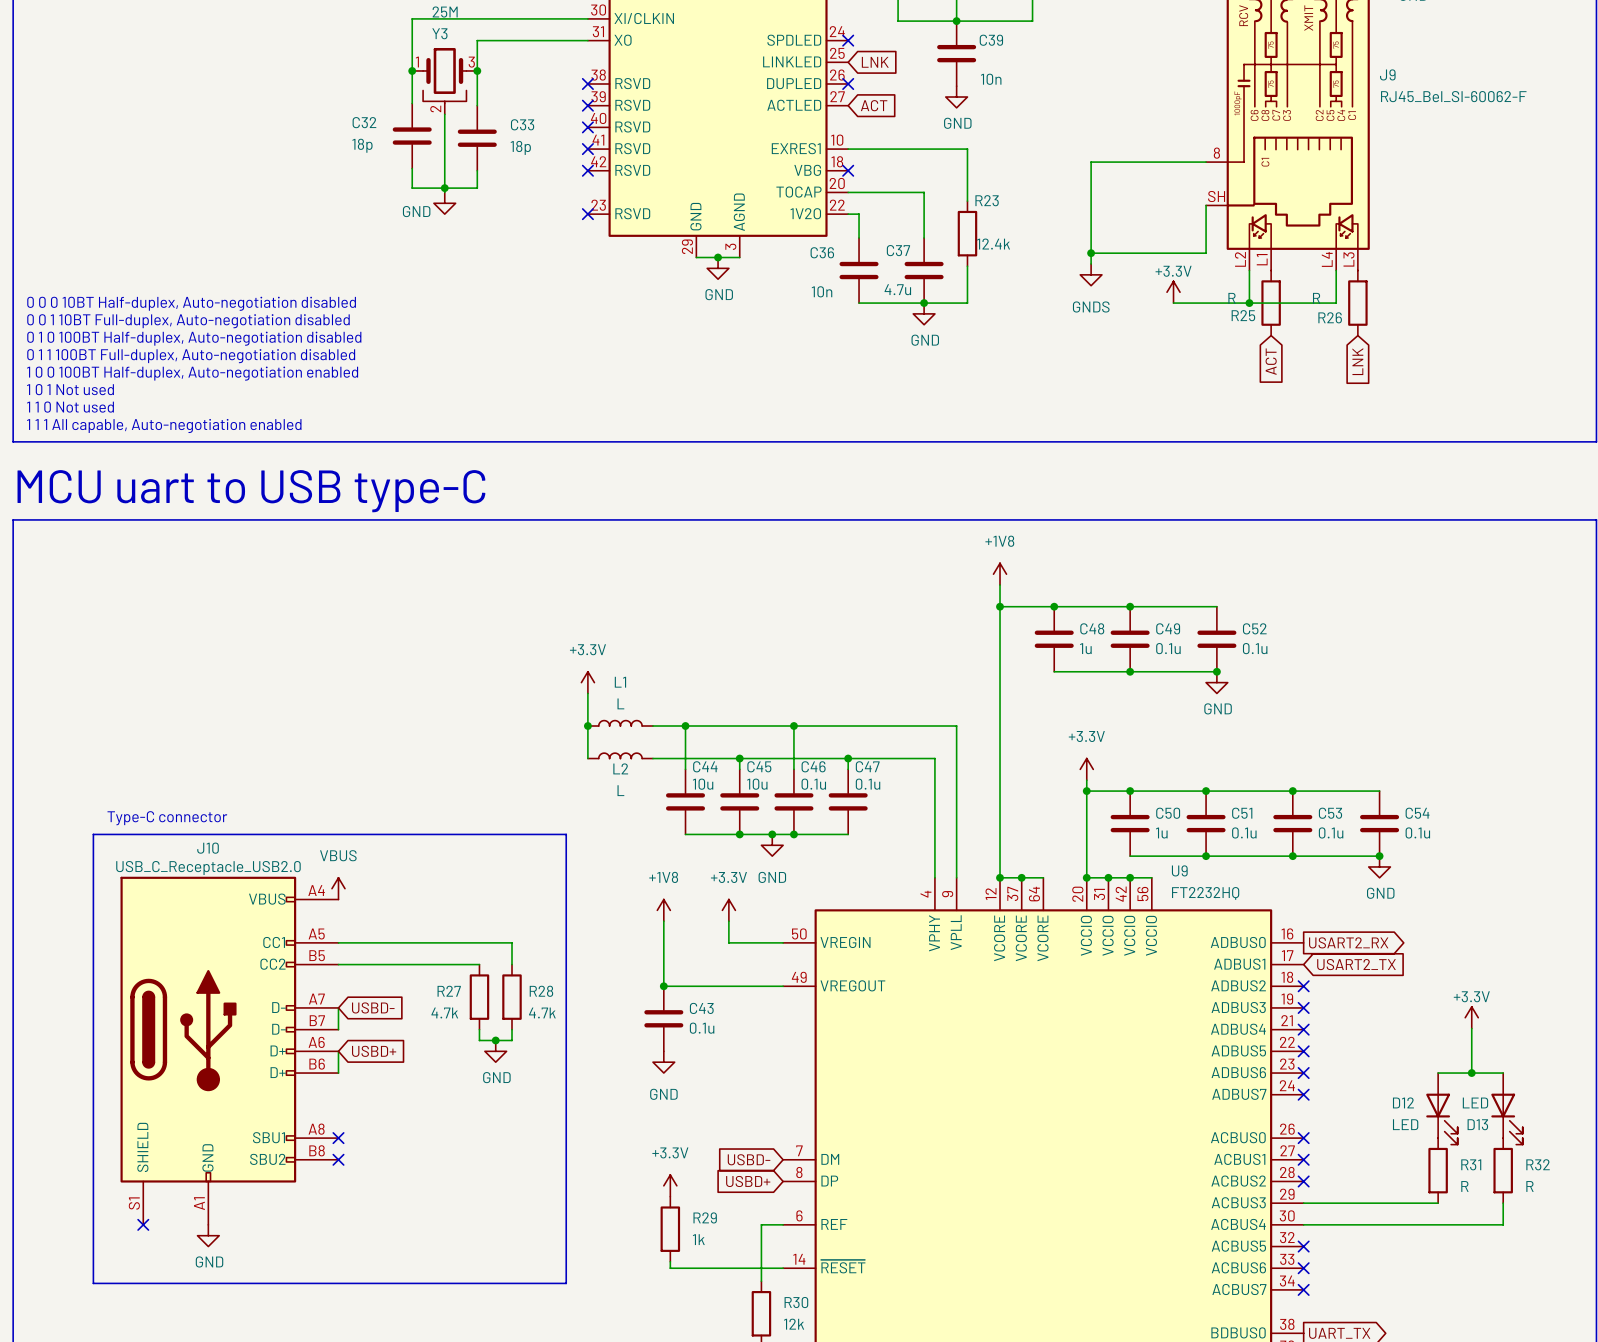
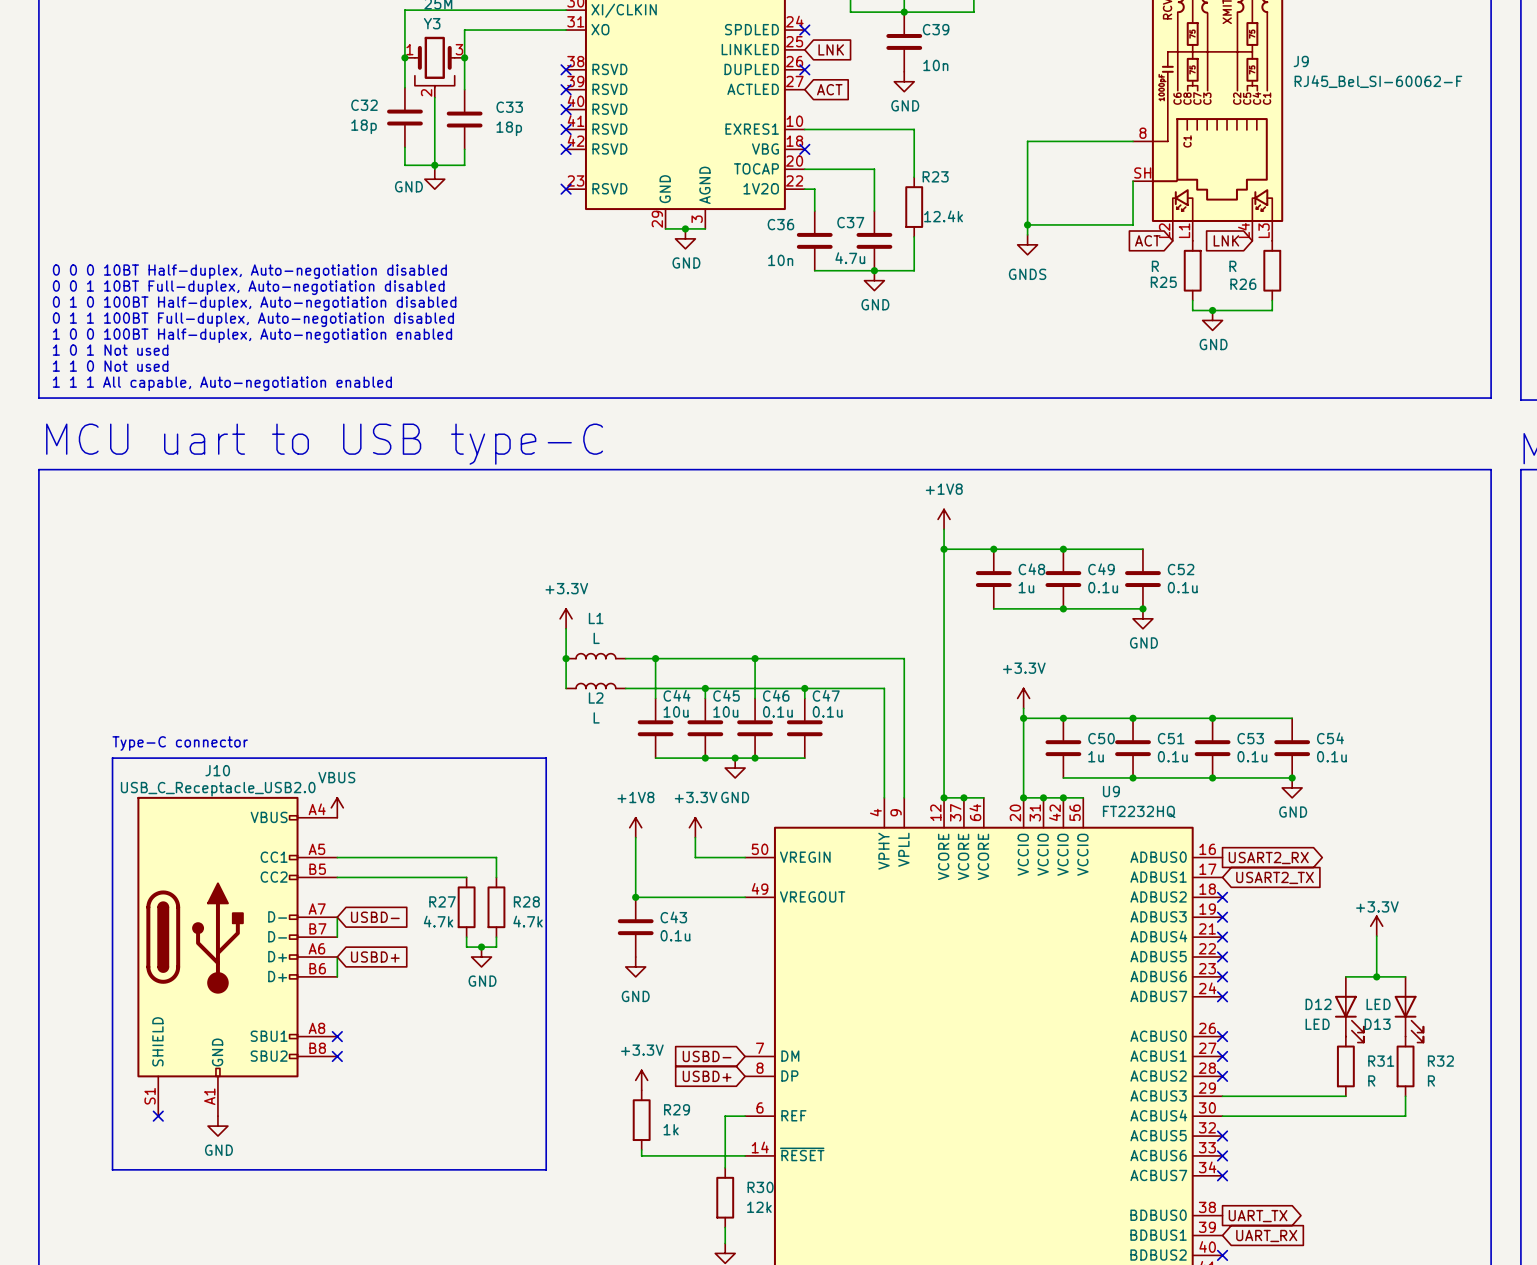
wire: (1249, 270) (1249, 303) -> none
wire: (1336, 270) (1336, 303) (1173, 303) -> none
power symbol: +3.3V (1173, 292) -> none
junction: (1249, 303) -> none
wire: none -> (1192, 300) (1192, 310) (1272, 310) (1272, 300)
junction: none -> (1212, 310)
power symbol: none -> GND (1212, 320)
global label rotation: 0° (1271, 361) -> 90° clockwise (1147, 240)
global label position: ACT (1271, 361) -> ACT (1147, 240)
global label rotation: 0° (1357, 361) -> 90° clockwise (1226, 240)
global label position: LNK (1357, 361) -> LNK (1226, 240)

